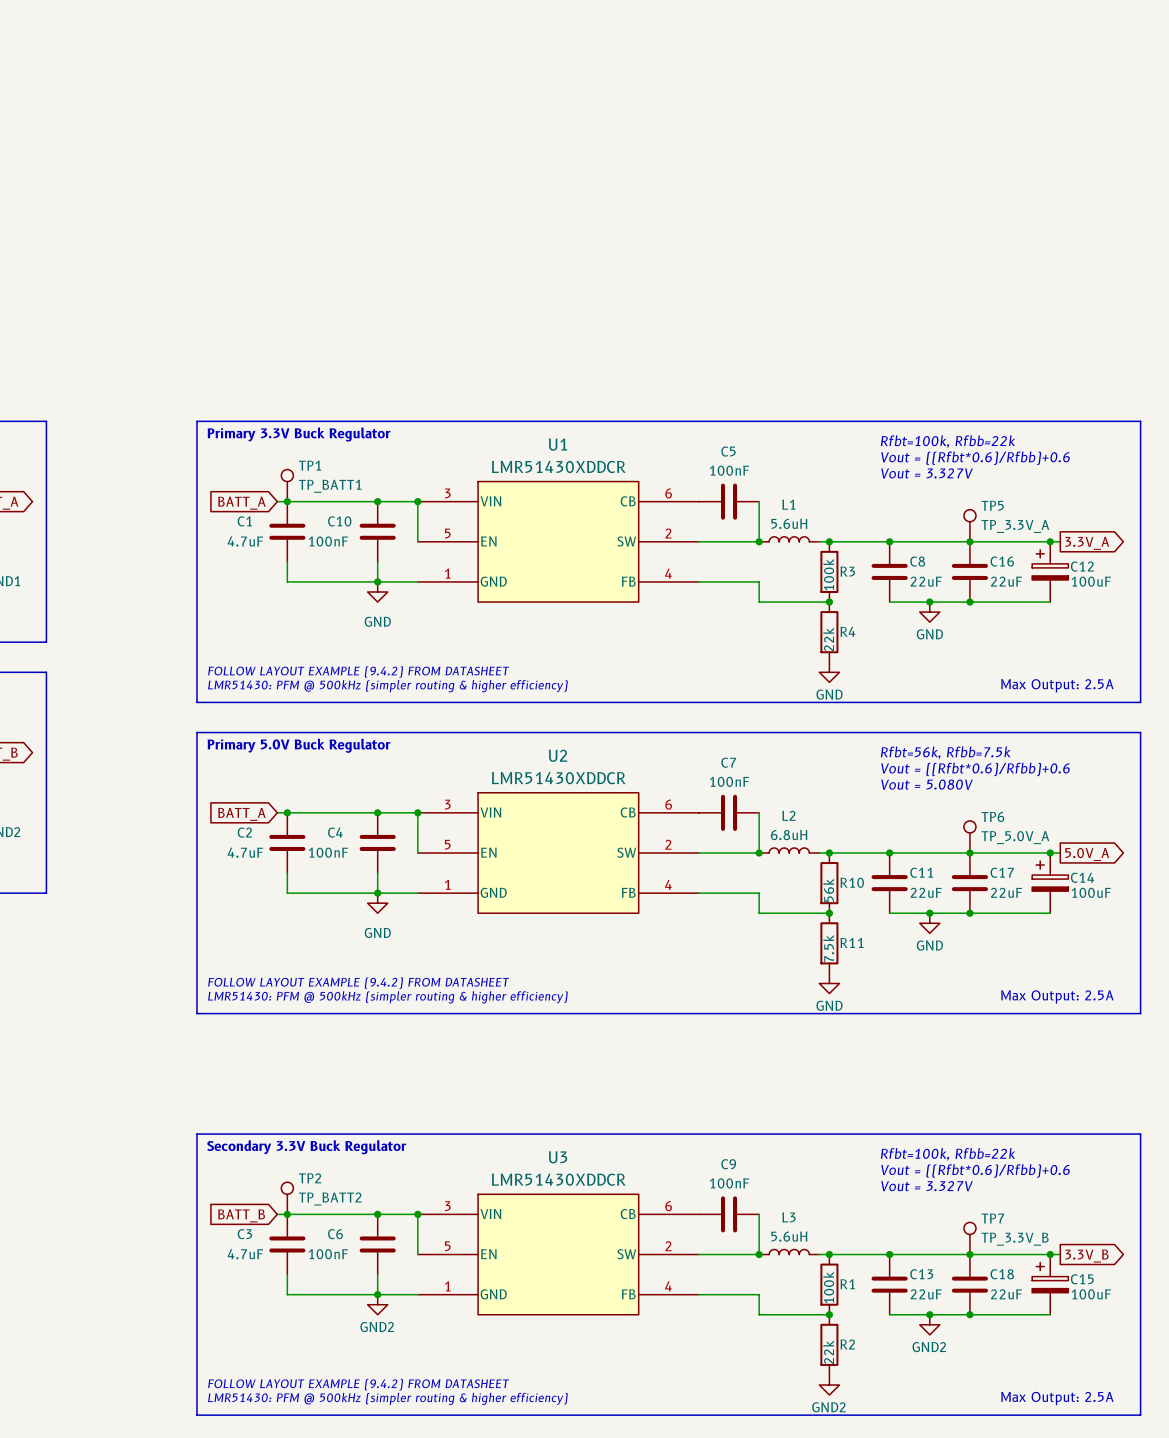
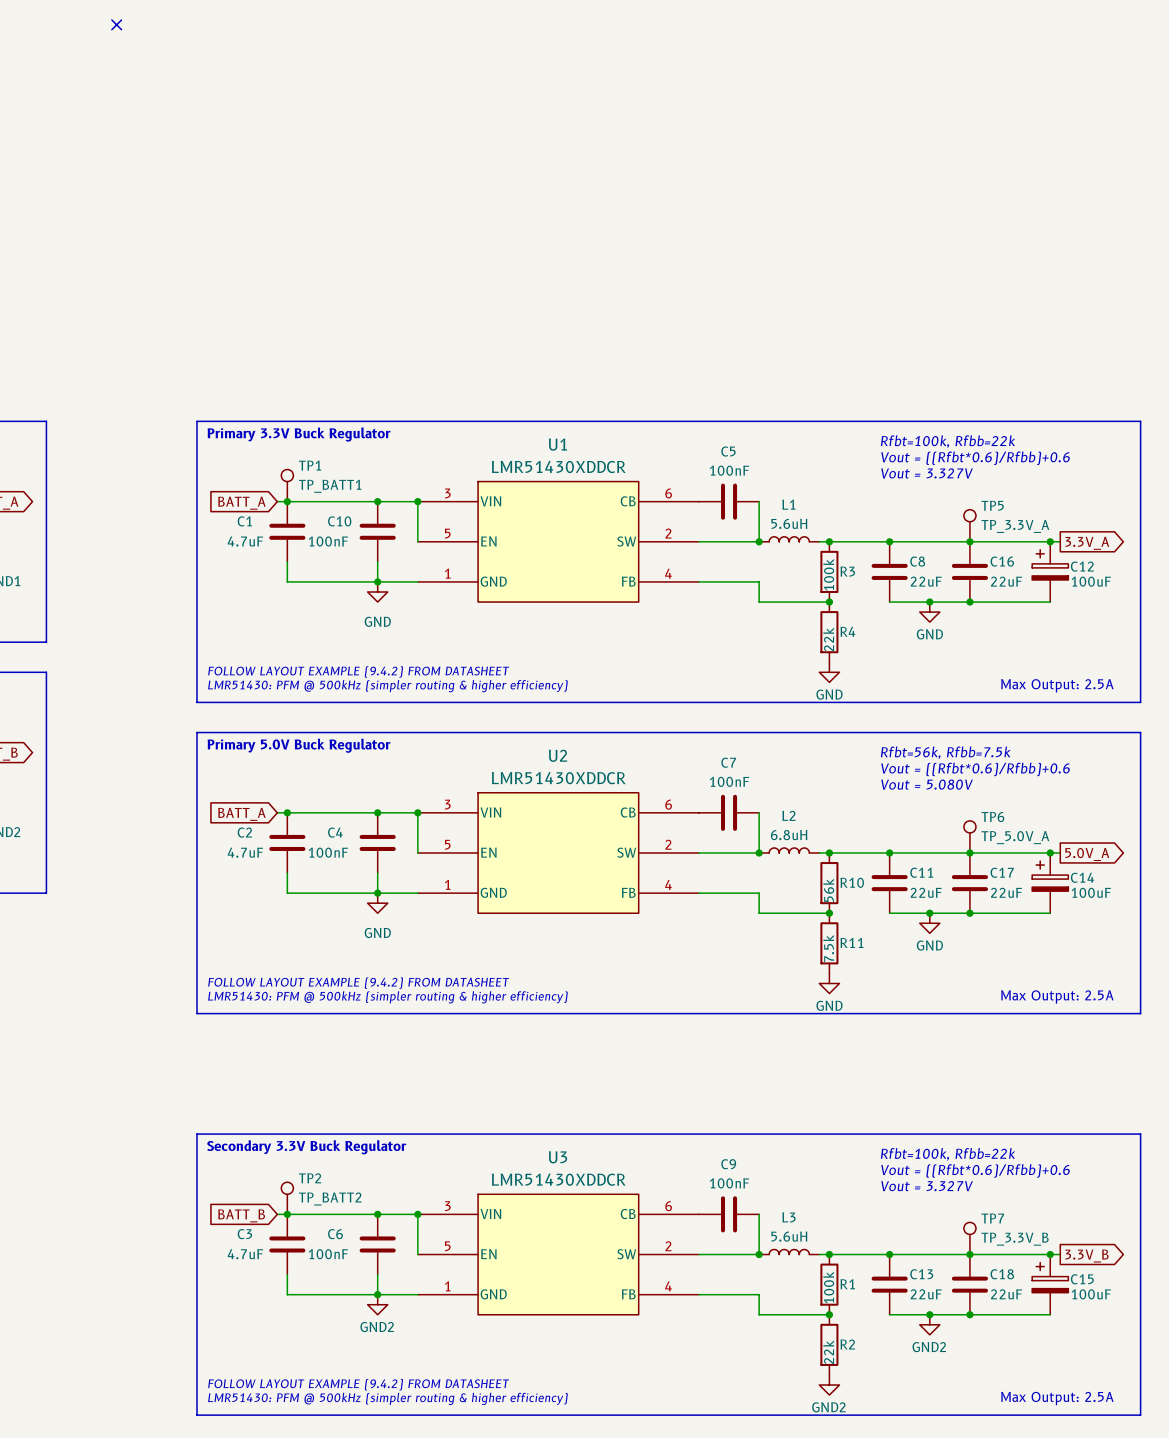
no-connect mark: none -> (116, 24)

